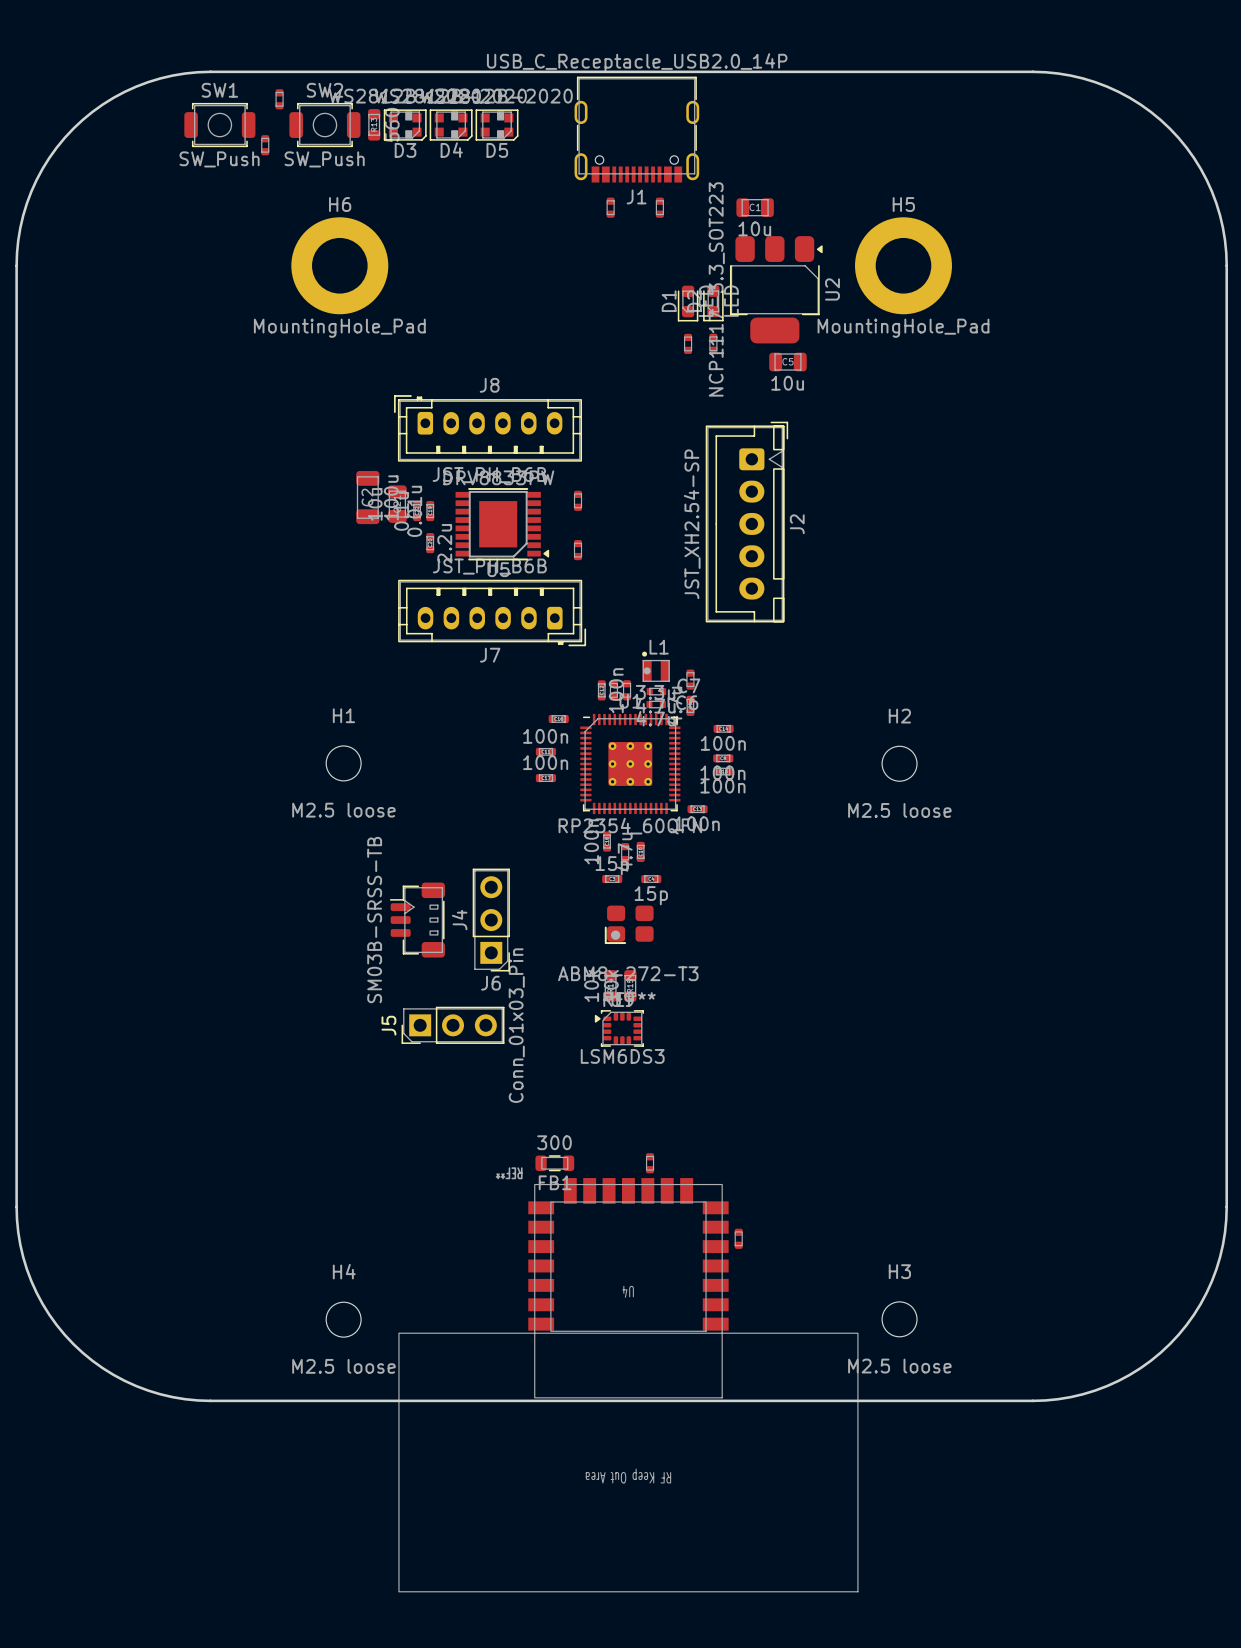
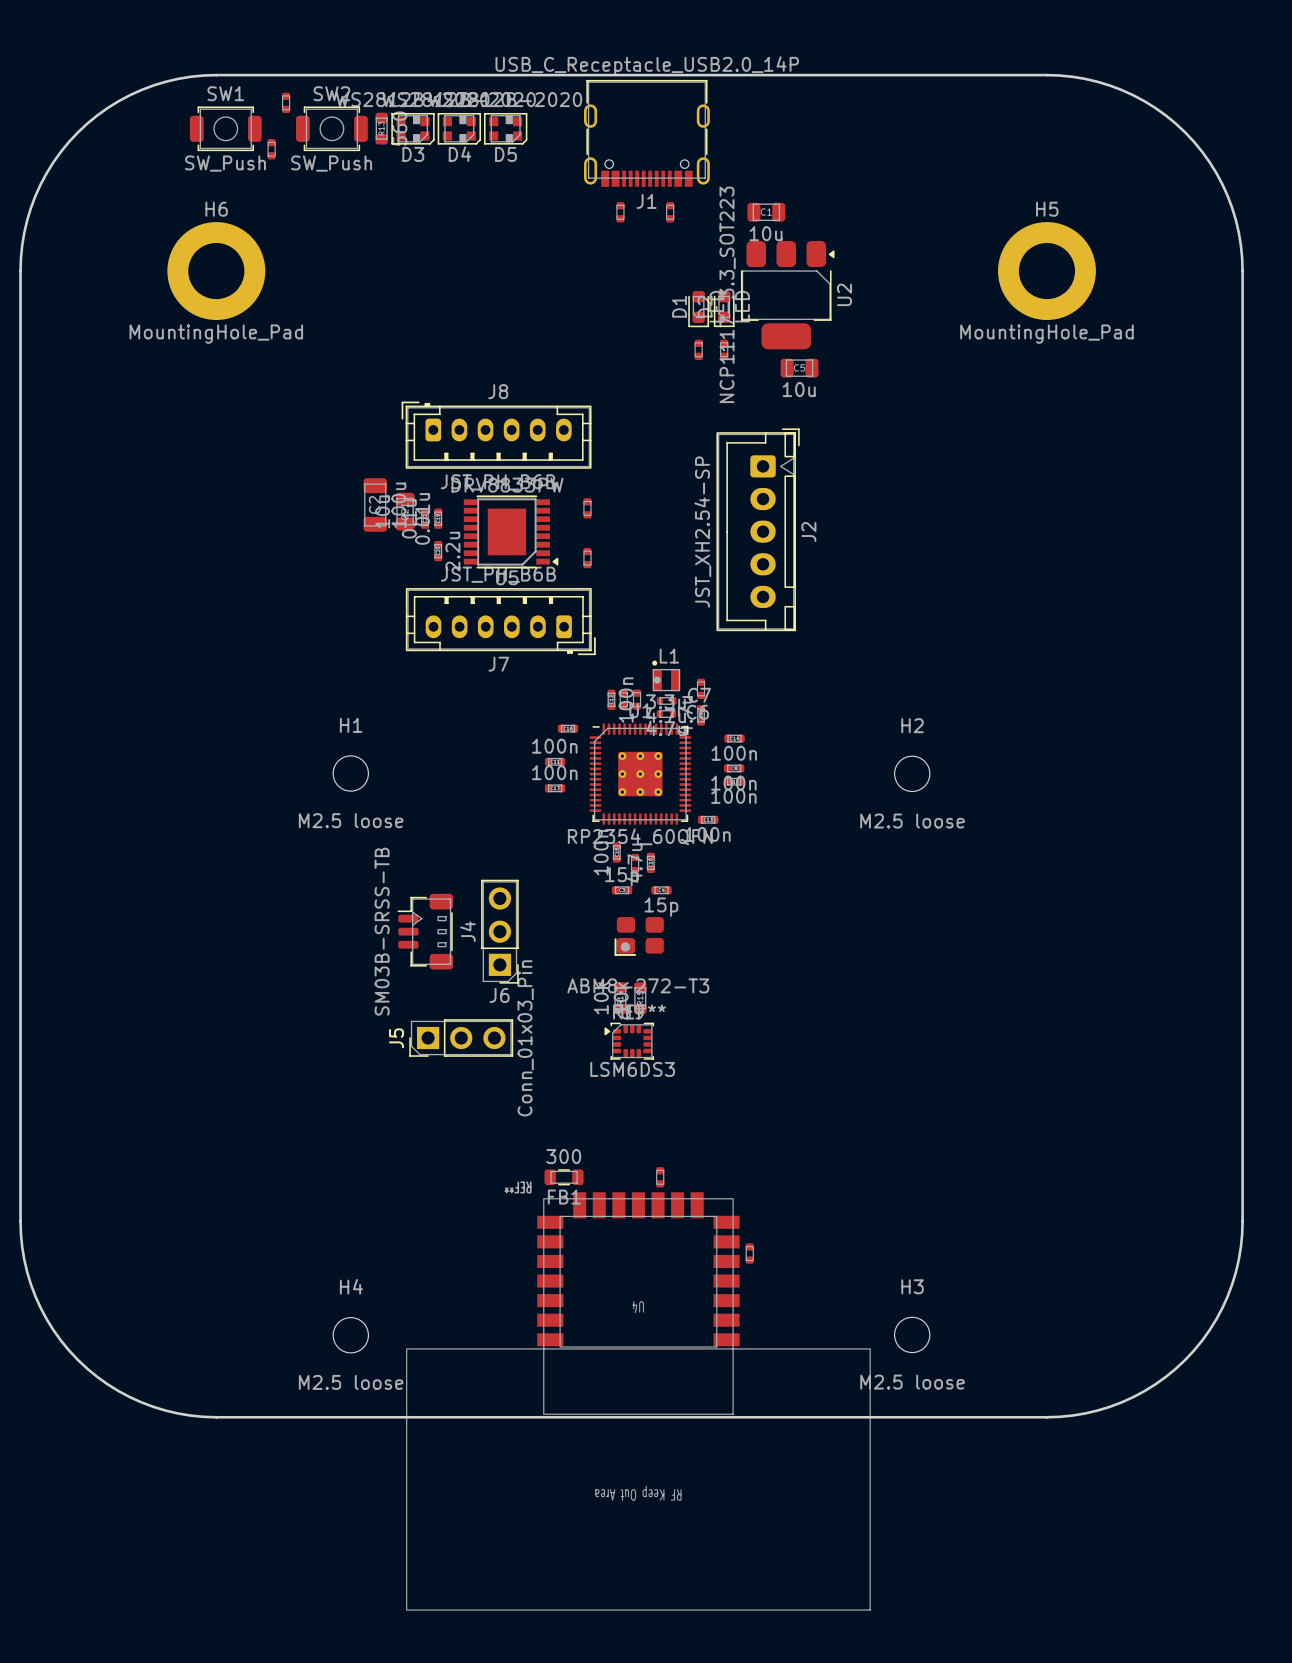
H6 position: (339, 265) -> (216, 271)
H5 position: (903, 265) -> (1046, 271)

